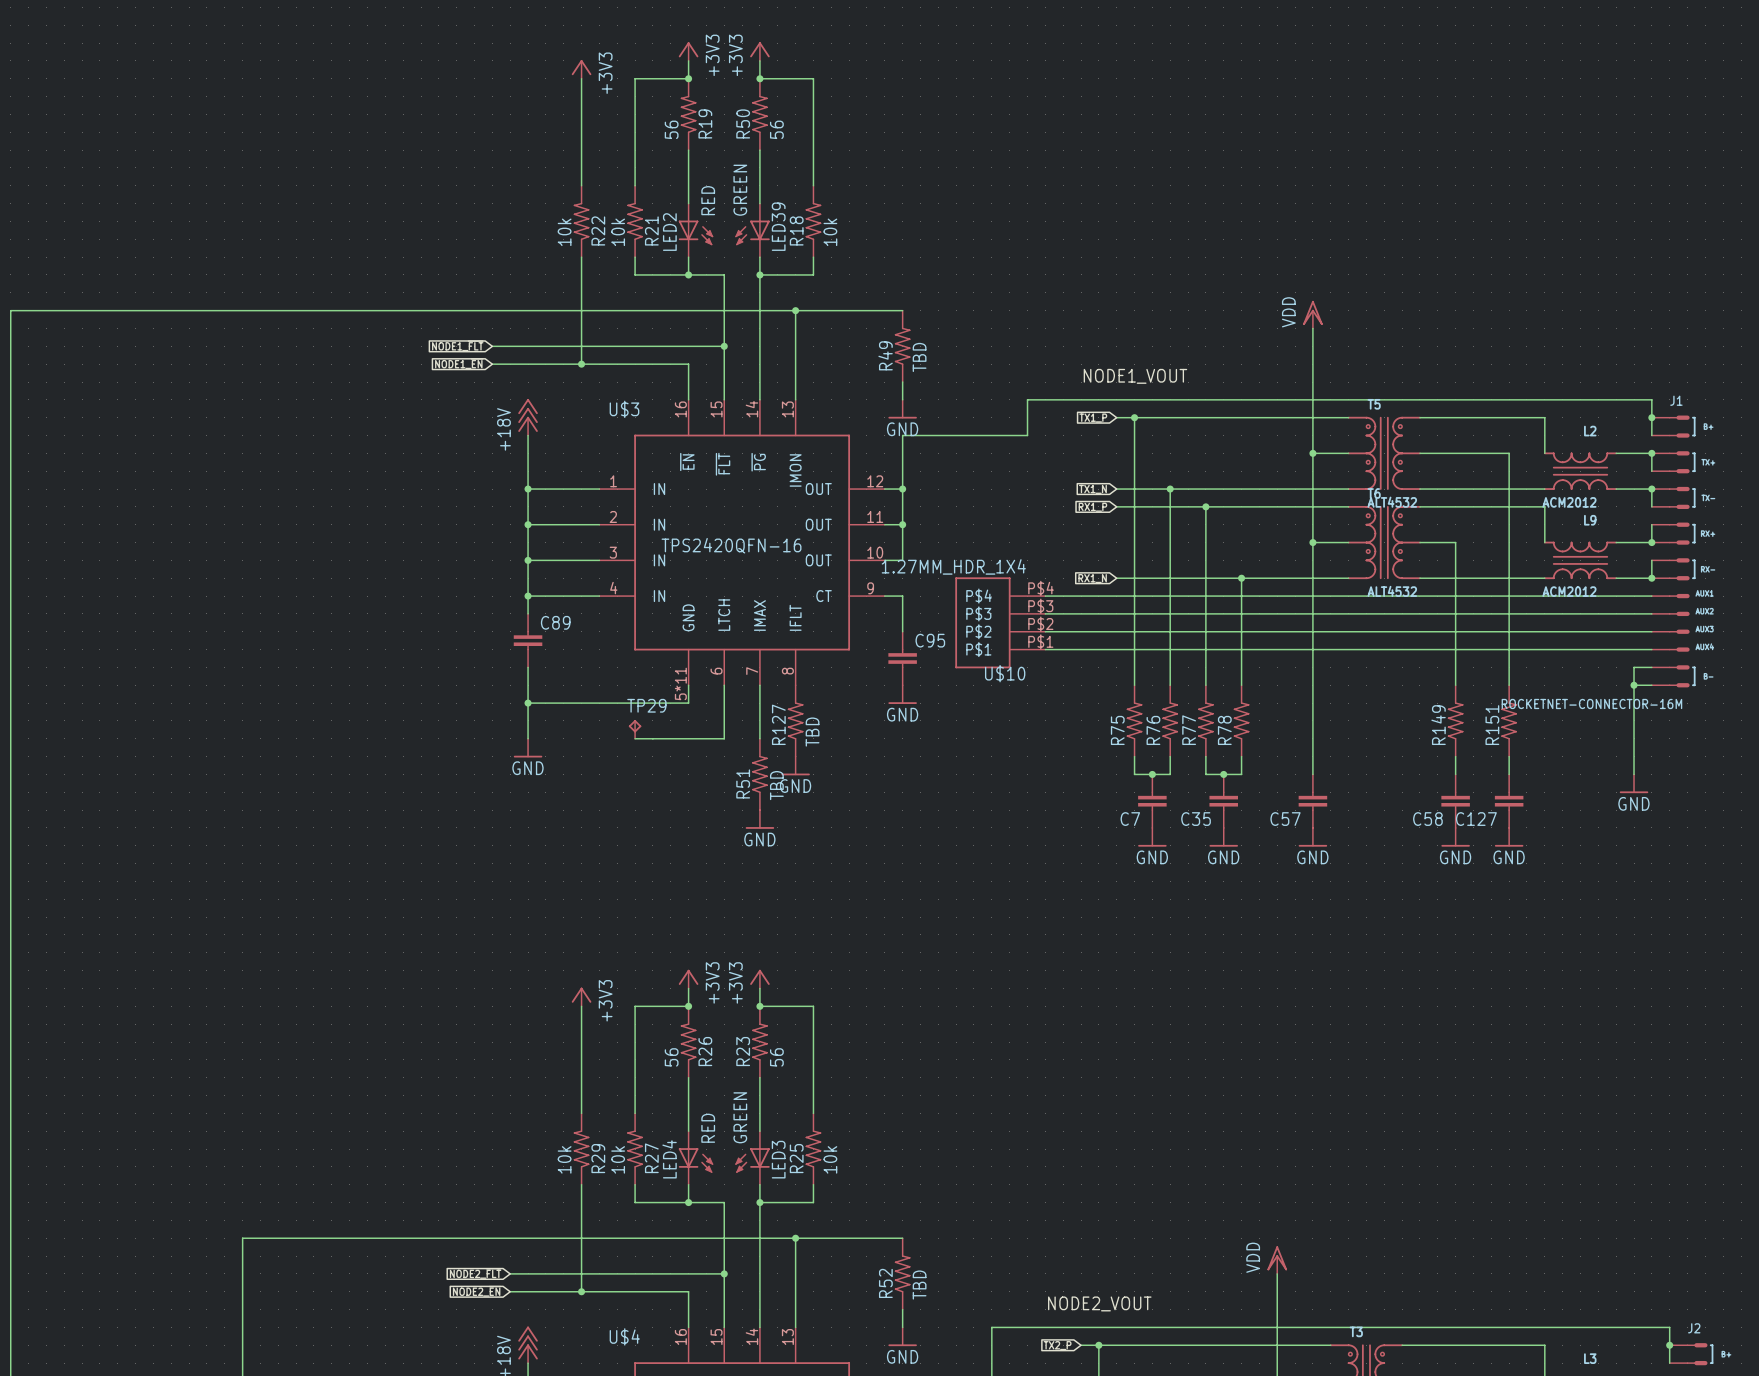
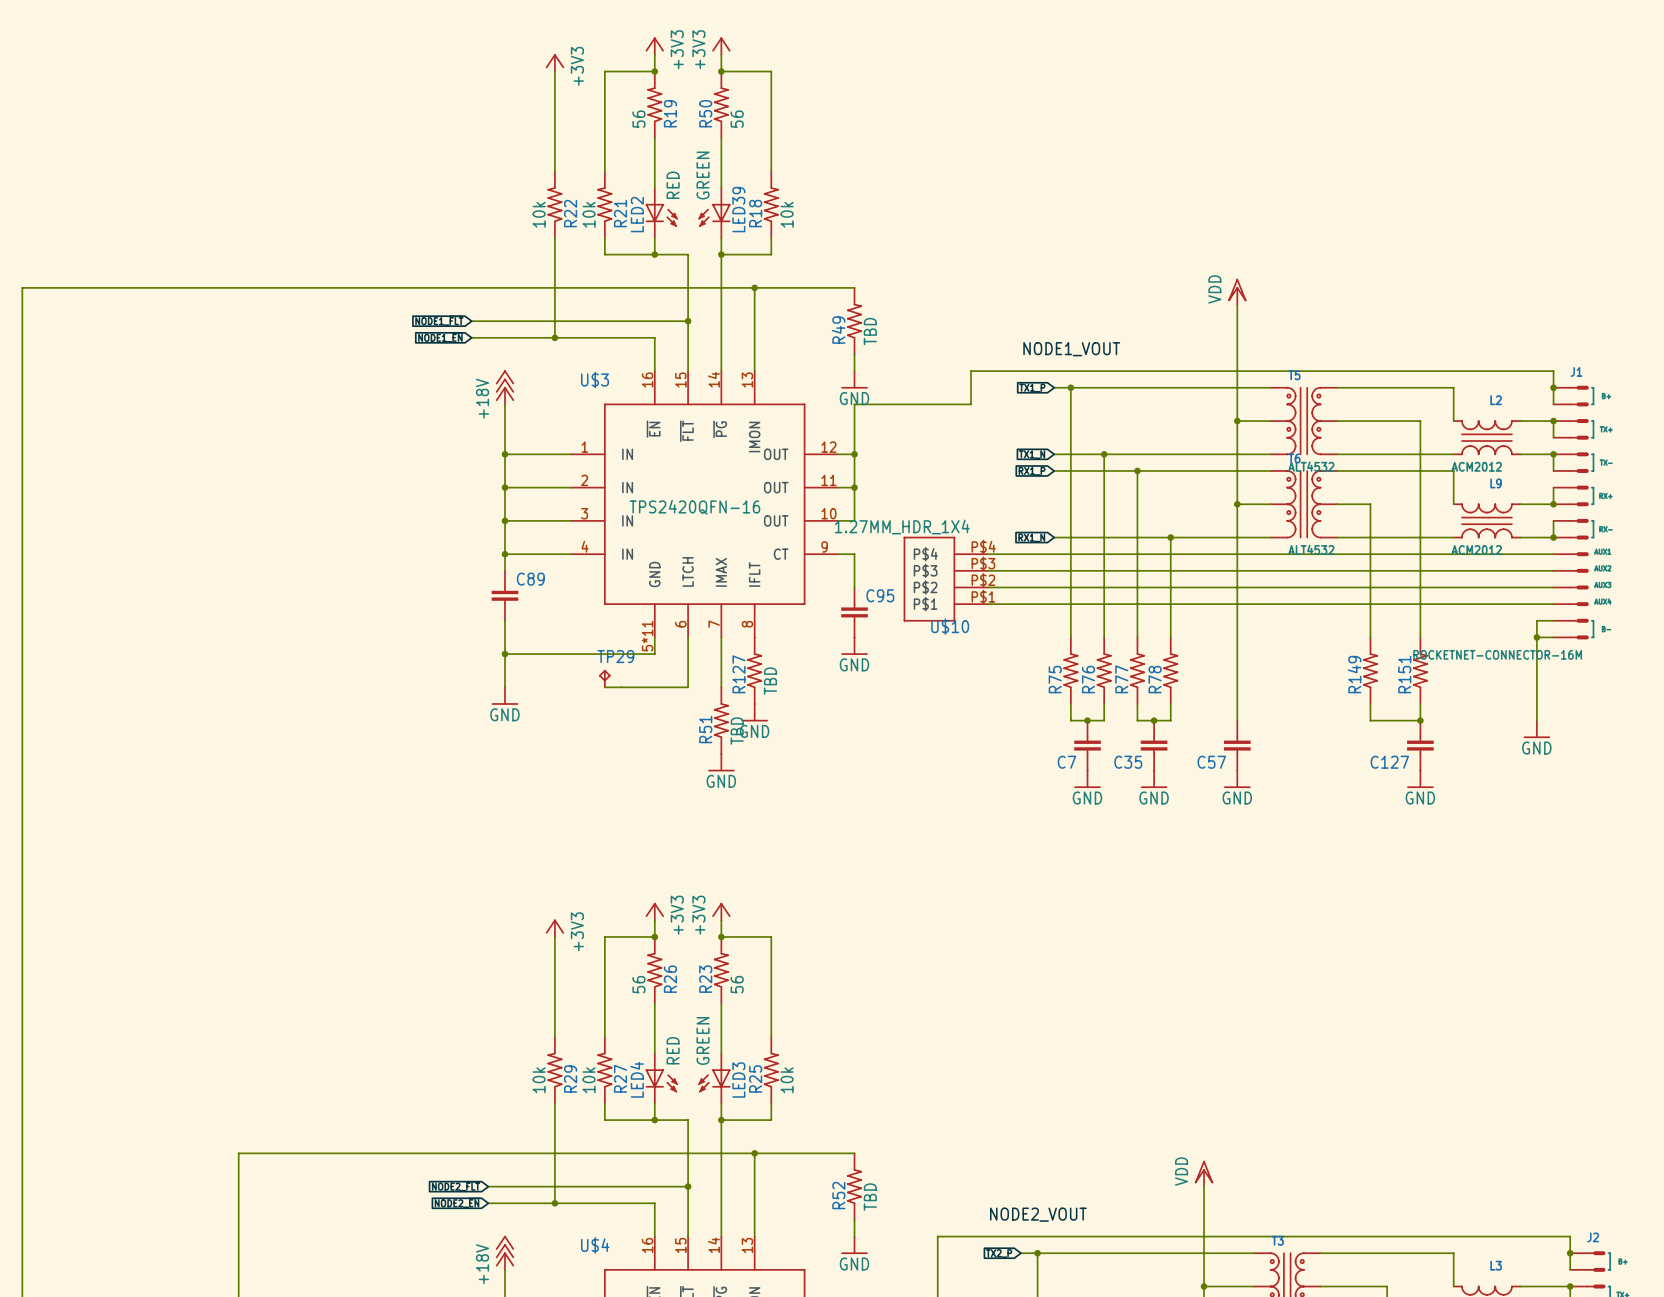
wire: none -> (1370, 720) (1420, 720)
junction: none -> (1420, 720)
C58: (1455, 801) -> none
power symbol: GND (1455, 837) -> none

